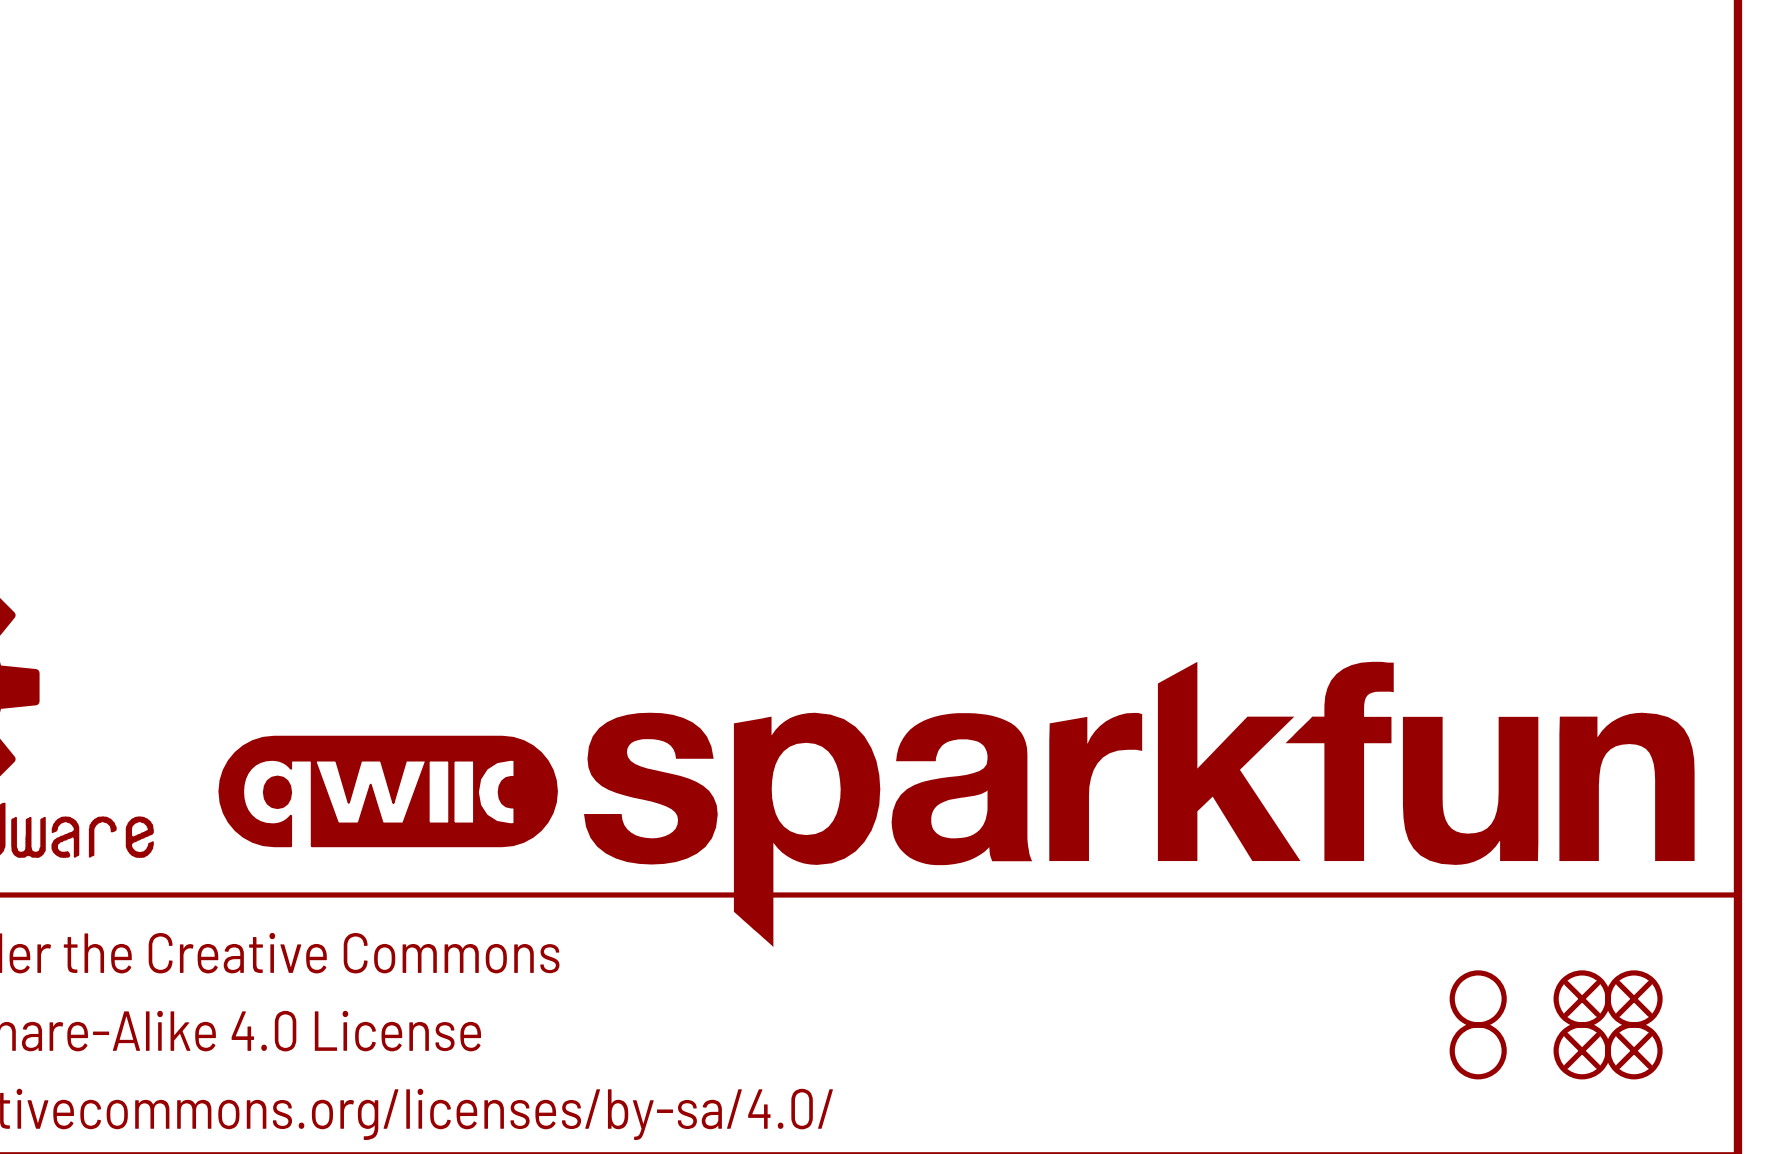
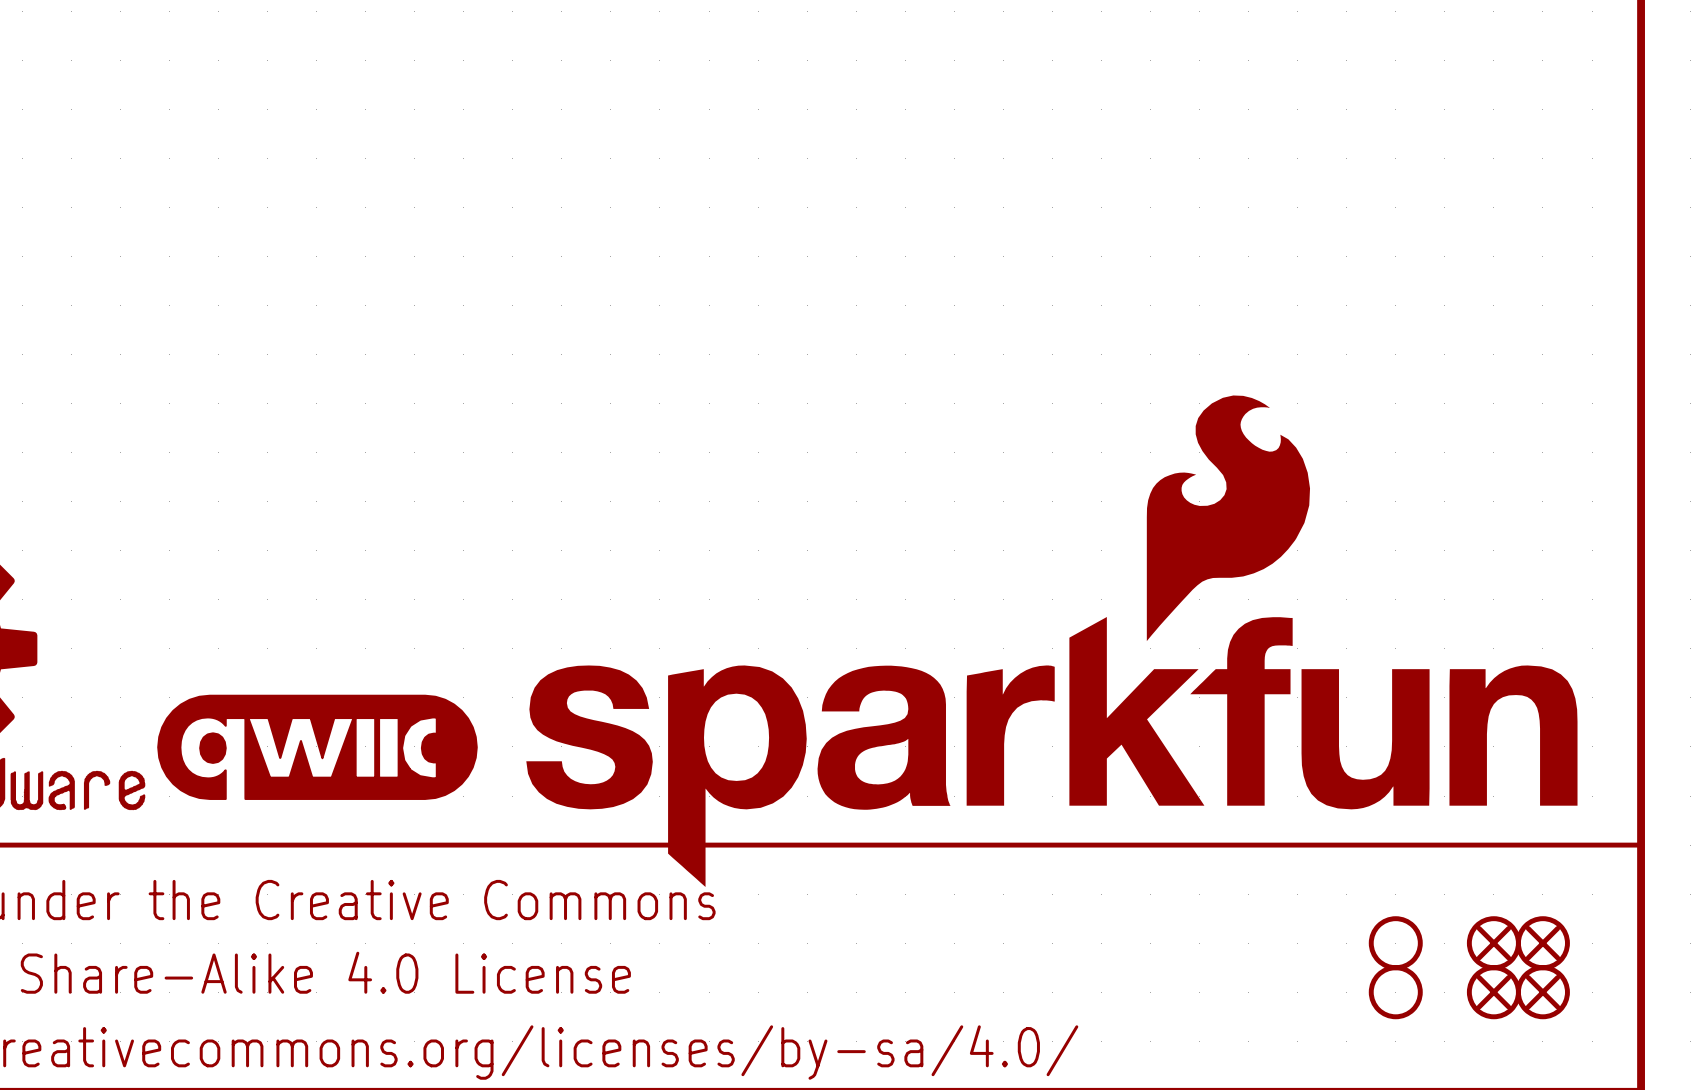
part: none -> (1051, 641)
part position: (388, 791) -> (317, 747)
part: (1139, 804) -> none

